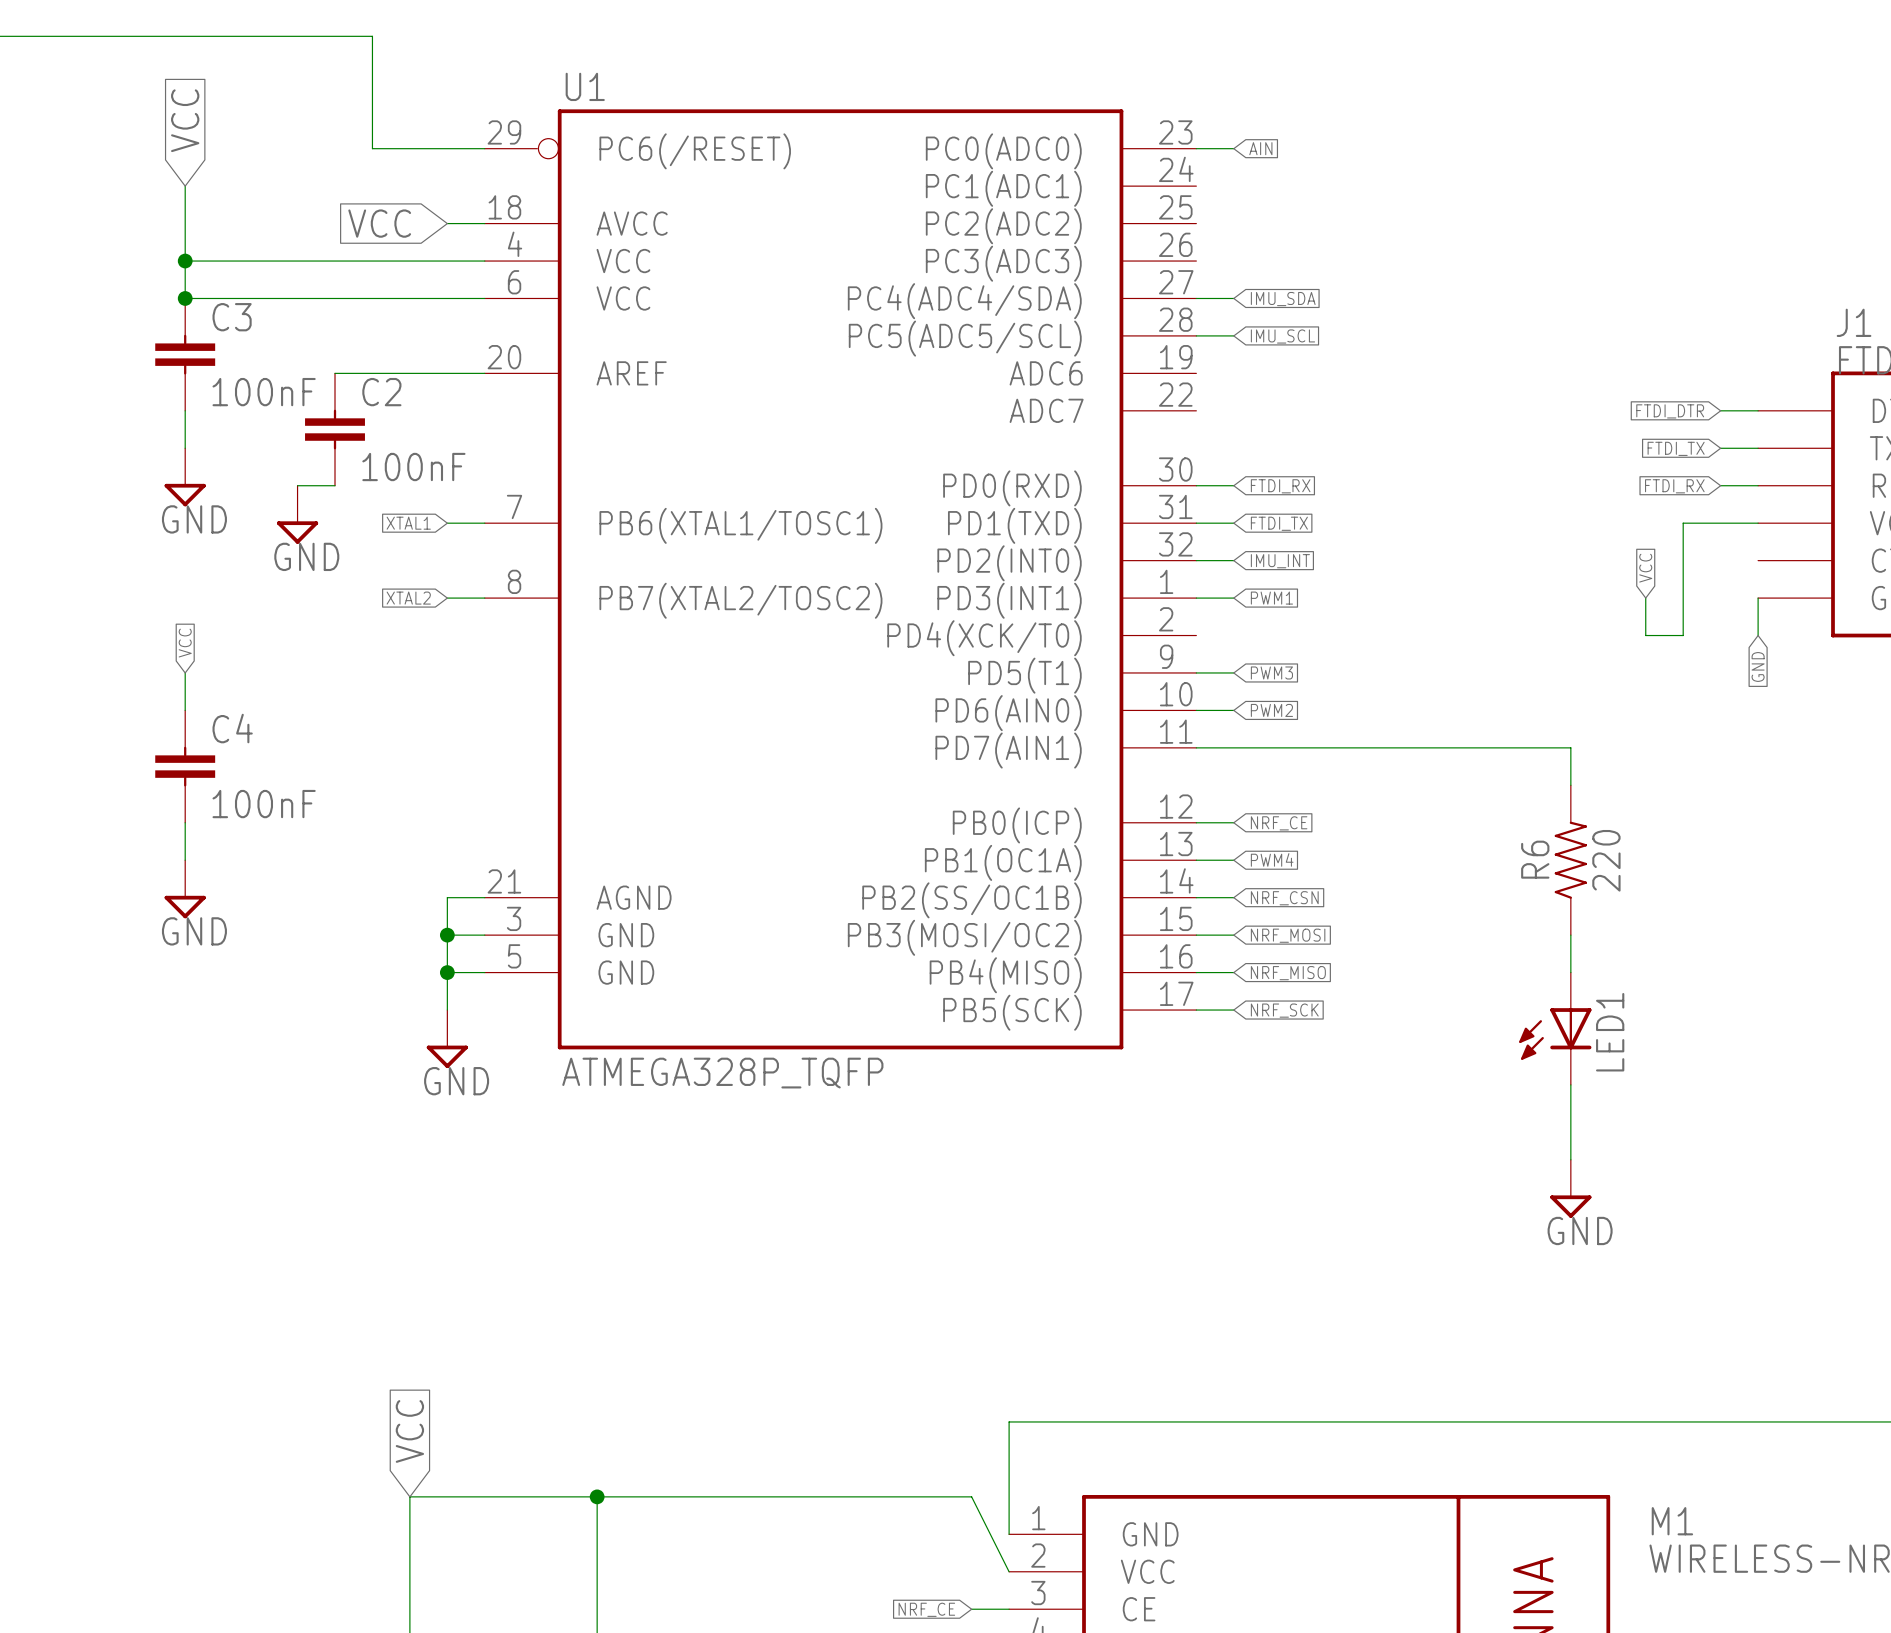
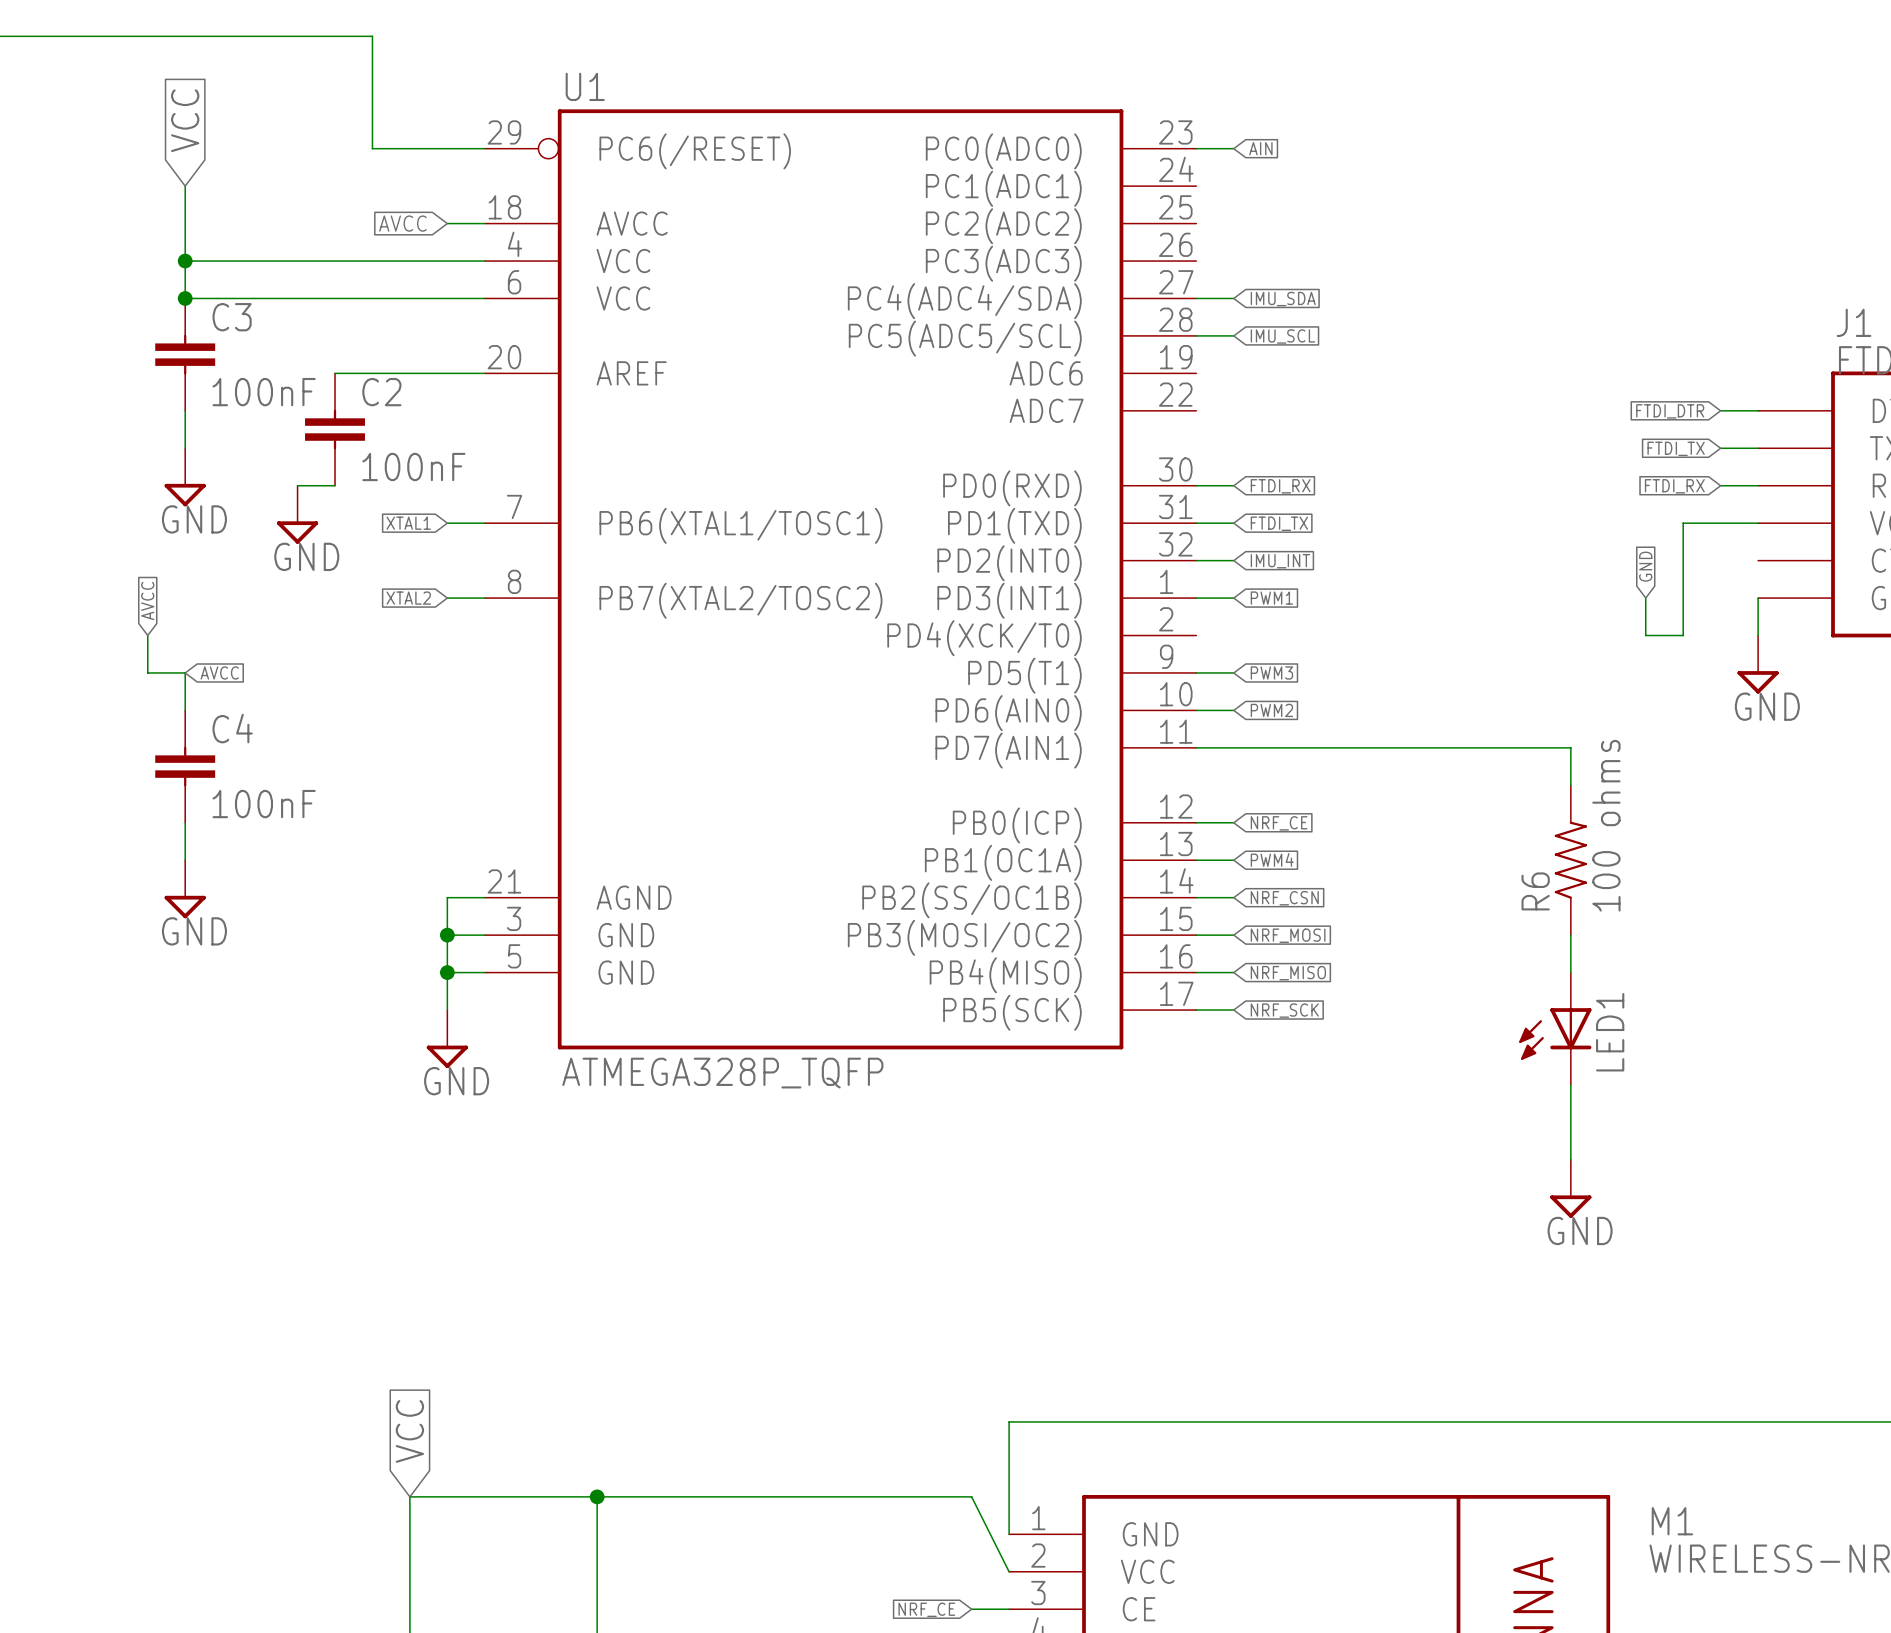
global label: VCC (379, 223) -> AVCC (402, 223)
global label: VCC (1645, 568) -> GND (1645, 566)
global label: none -> AVCC (147, 601)
wire: none -> (147, 635) (147, 672) (185, 672)
global label: VCC (185, 643) -> AVCC (219, 672)
power symbol: none -> GND (1758, 664)
global label: GND (1758, 666) -> none
R6 name position: R6 (1535, 859) -> R6 (1535, 891)
R6 value: 220 (1606, 860) -> 100 ohms (1606, 825)

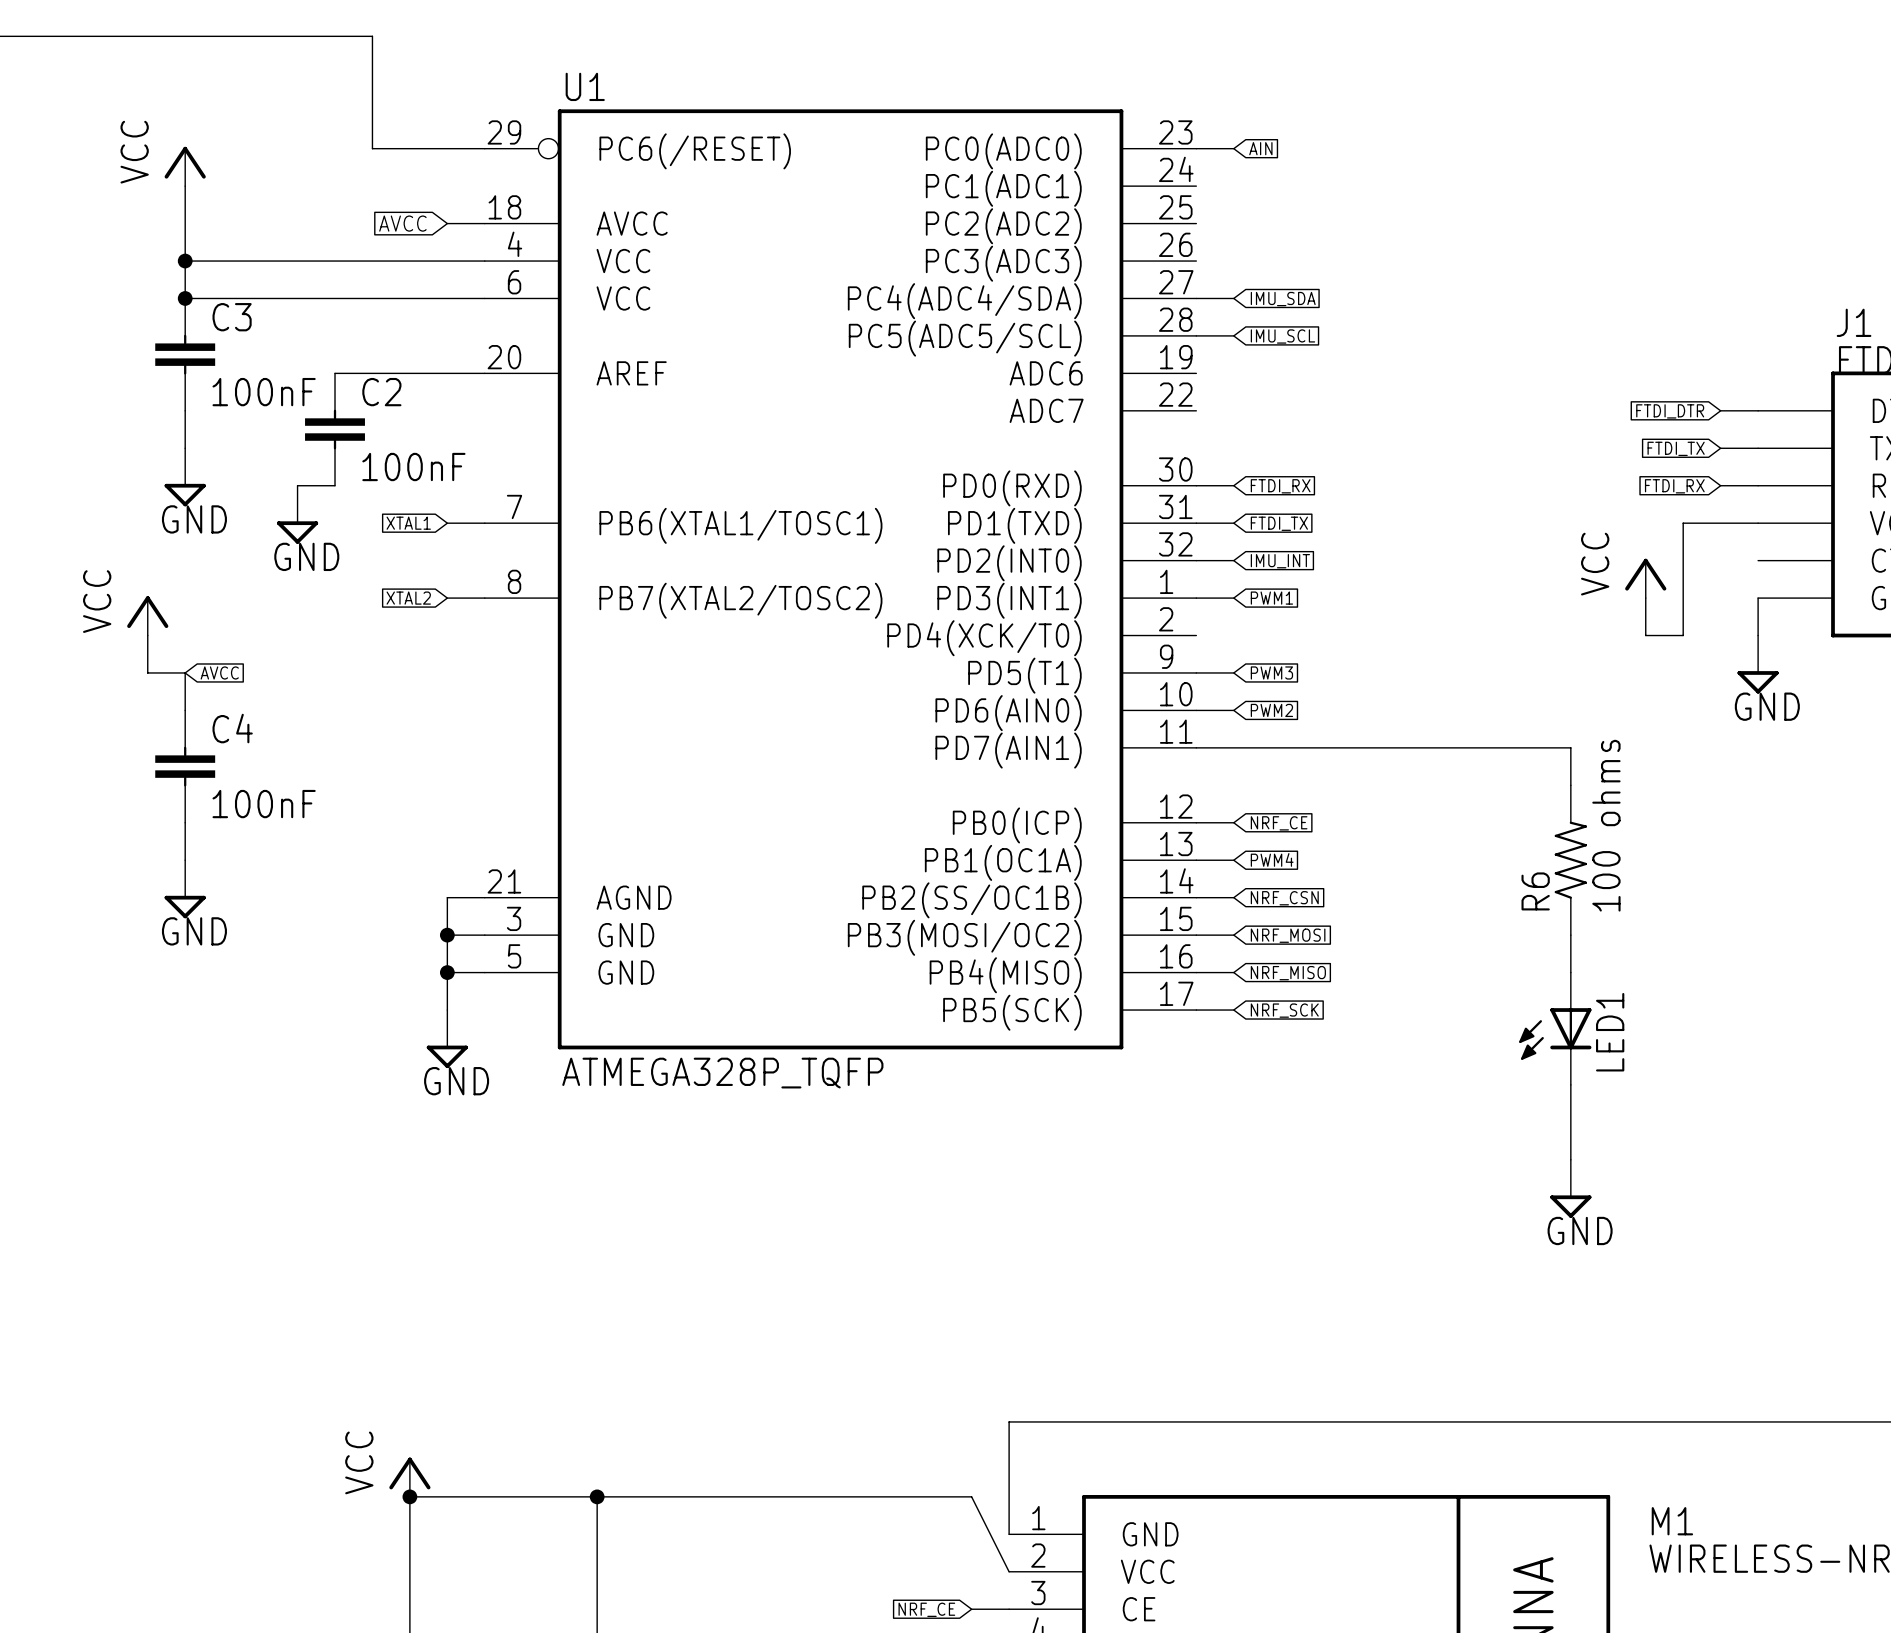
global label: VCC (185, 120) -> none
power symbol: none -> VCC (185, 166)
global label: GND (1645, 566) -> none
power symbol: none -> VCC (1645, 578)
global label: AVCC (147, 601) -> none
power symbol: none -> VCC (147, 615)
global label: VCC (409, 1431) -> none
power symbol: none -> VCC (409, 1477)
junction: none -> (409, 1496)

